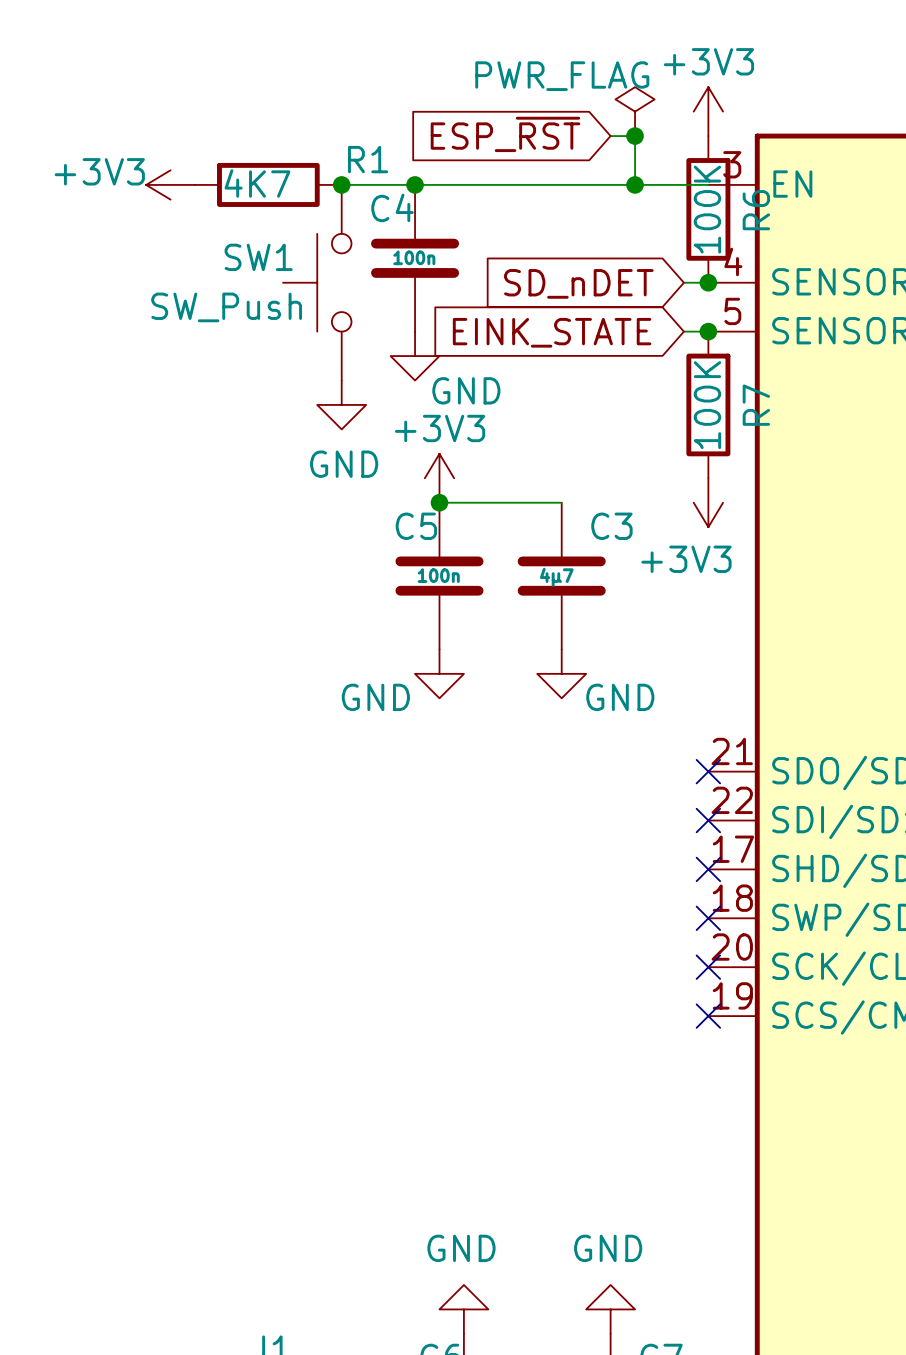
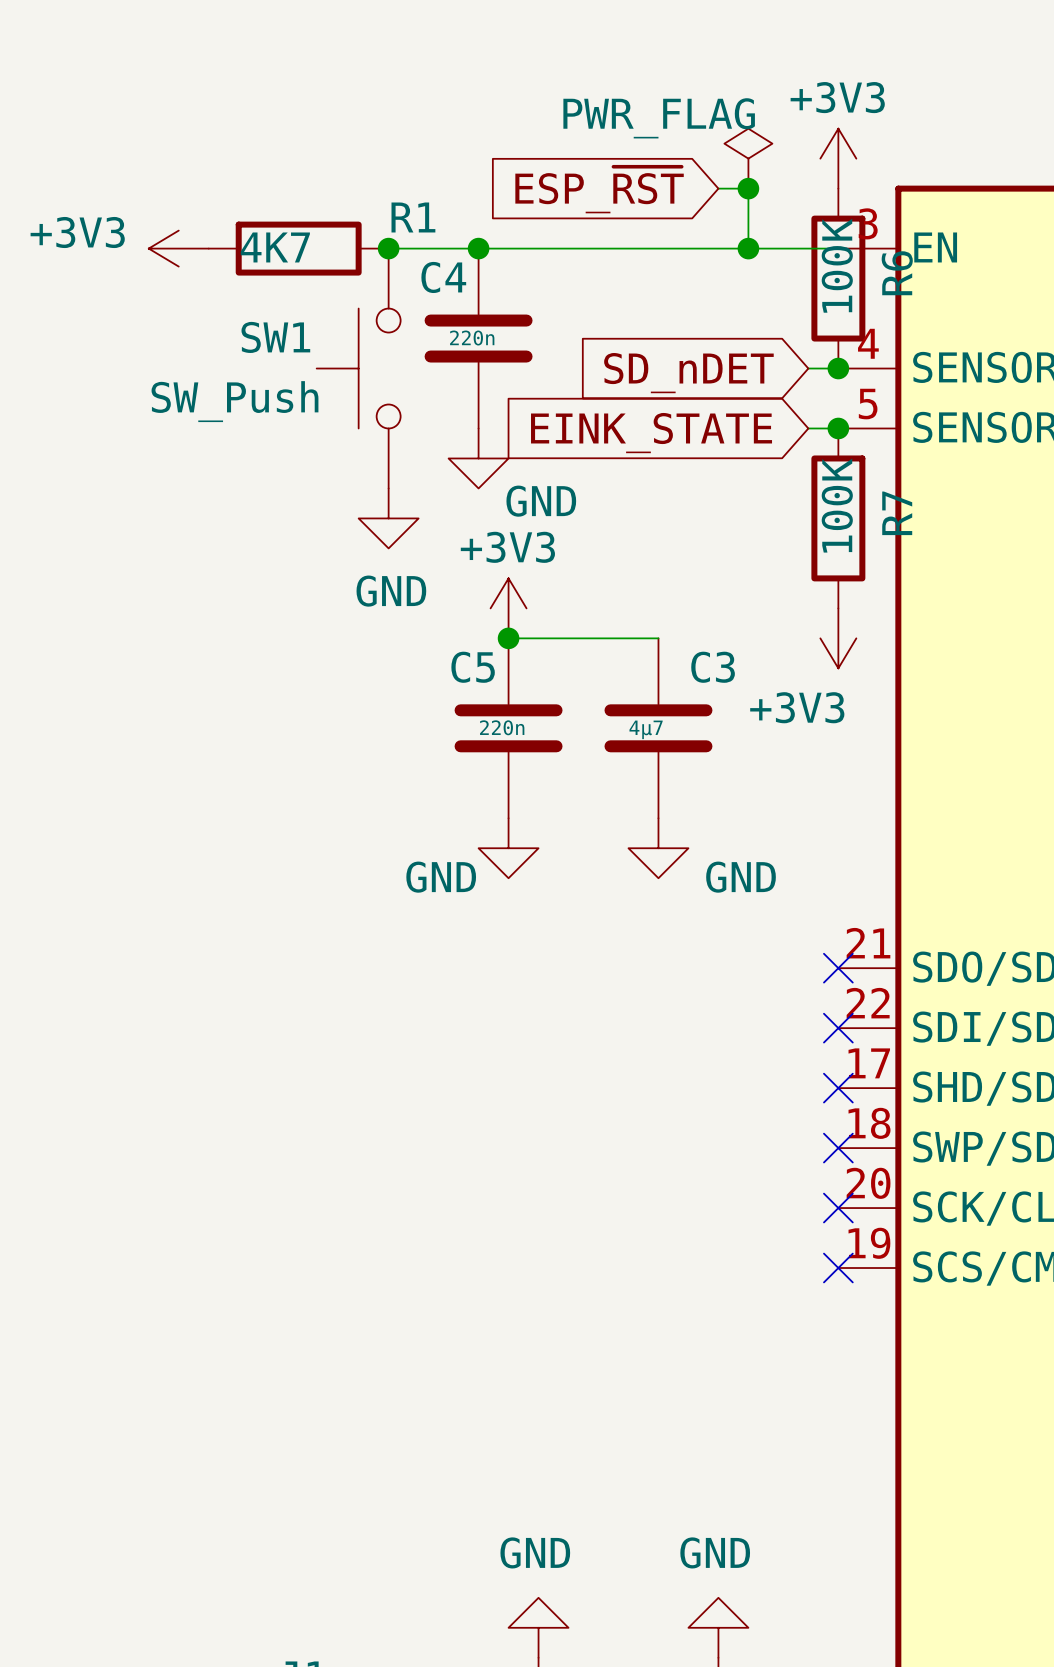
C4 value: 100n (414, 257) -> 220n (472, 338)
C5 value: 100n (438, 575) -> 220n (502, 727)

